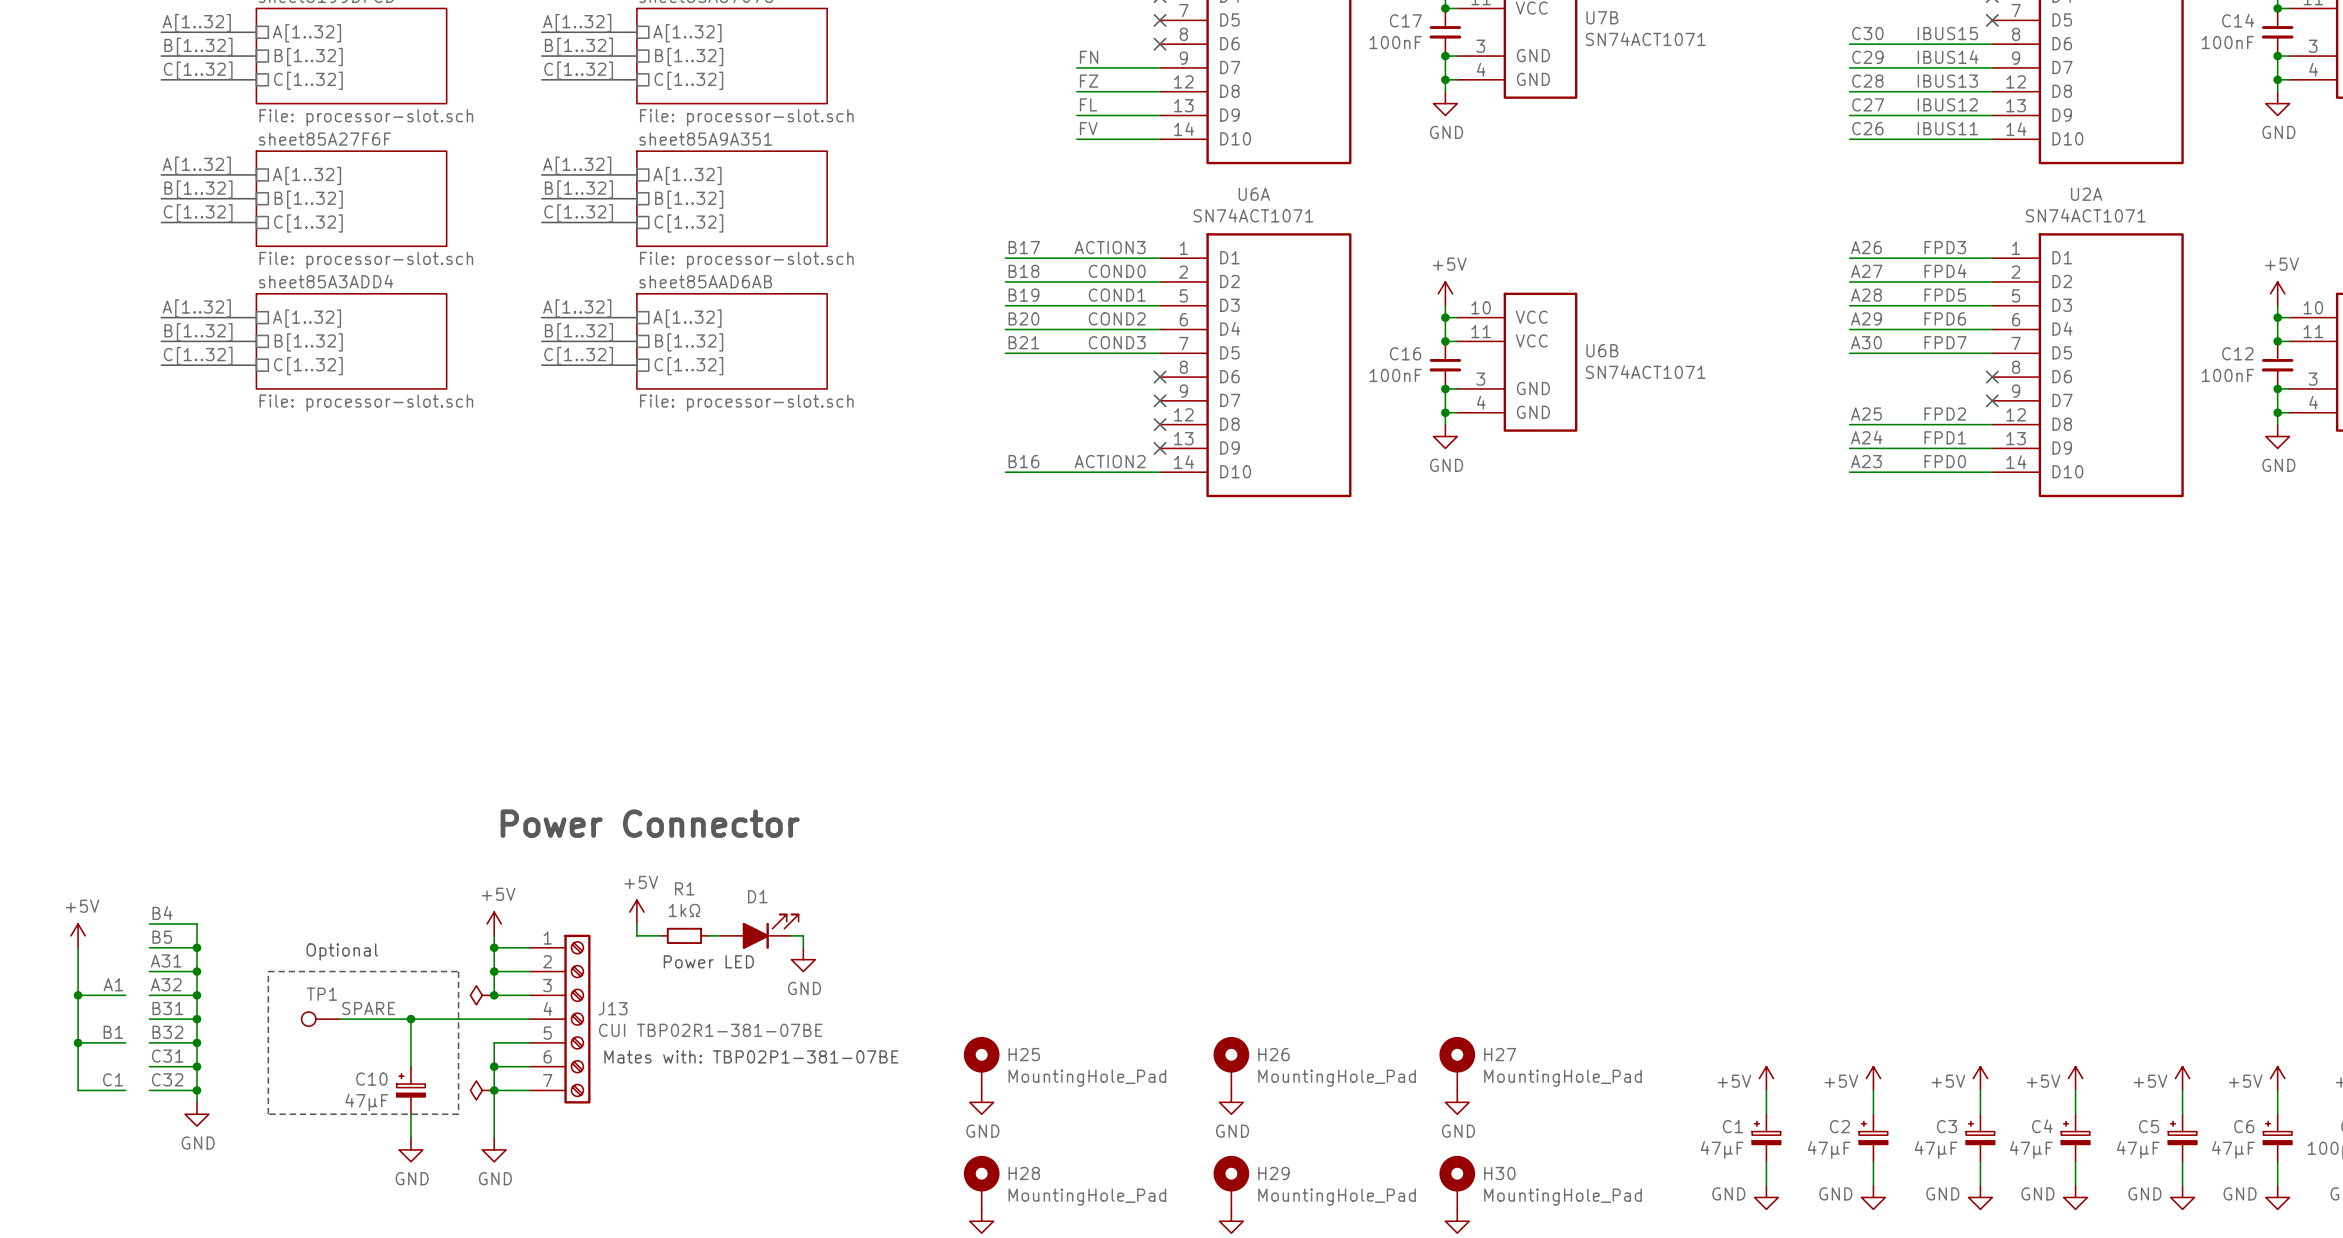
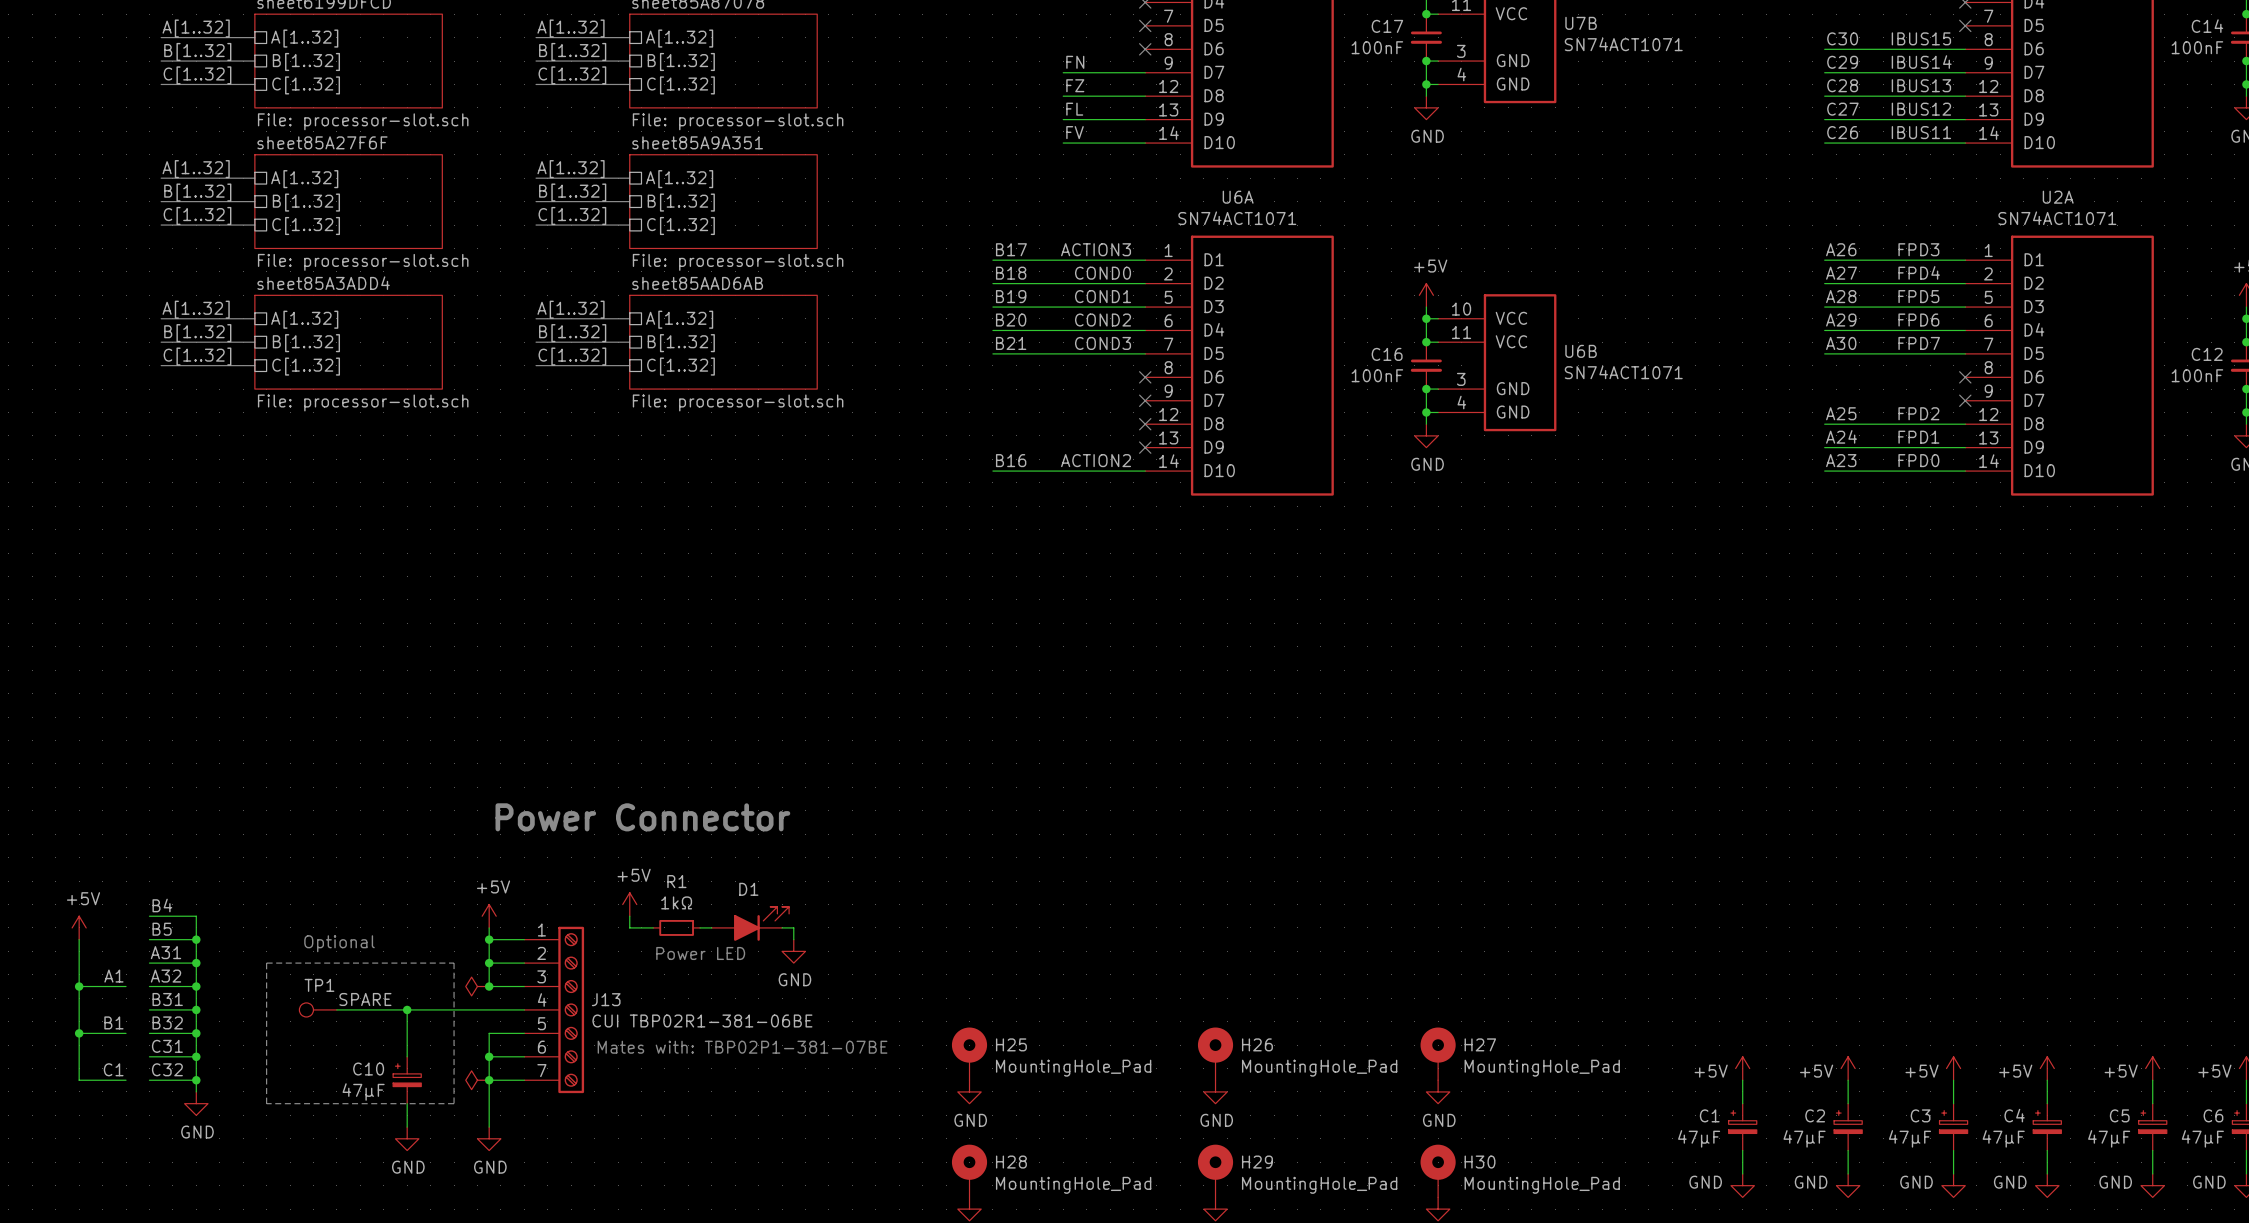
J13 value: CUI TBP02R1-381-07BE (710, 1030) -> CUI TBP02R1-381-06BE (702, 1020)

